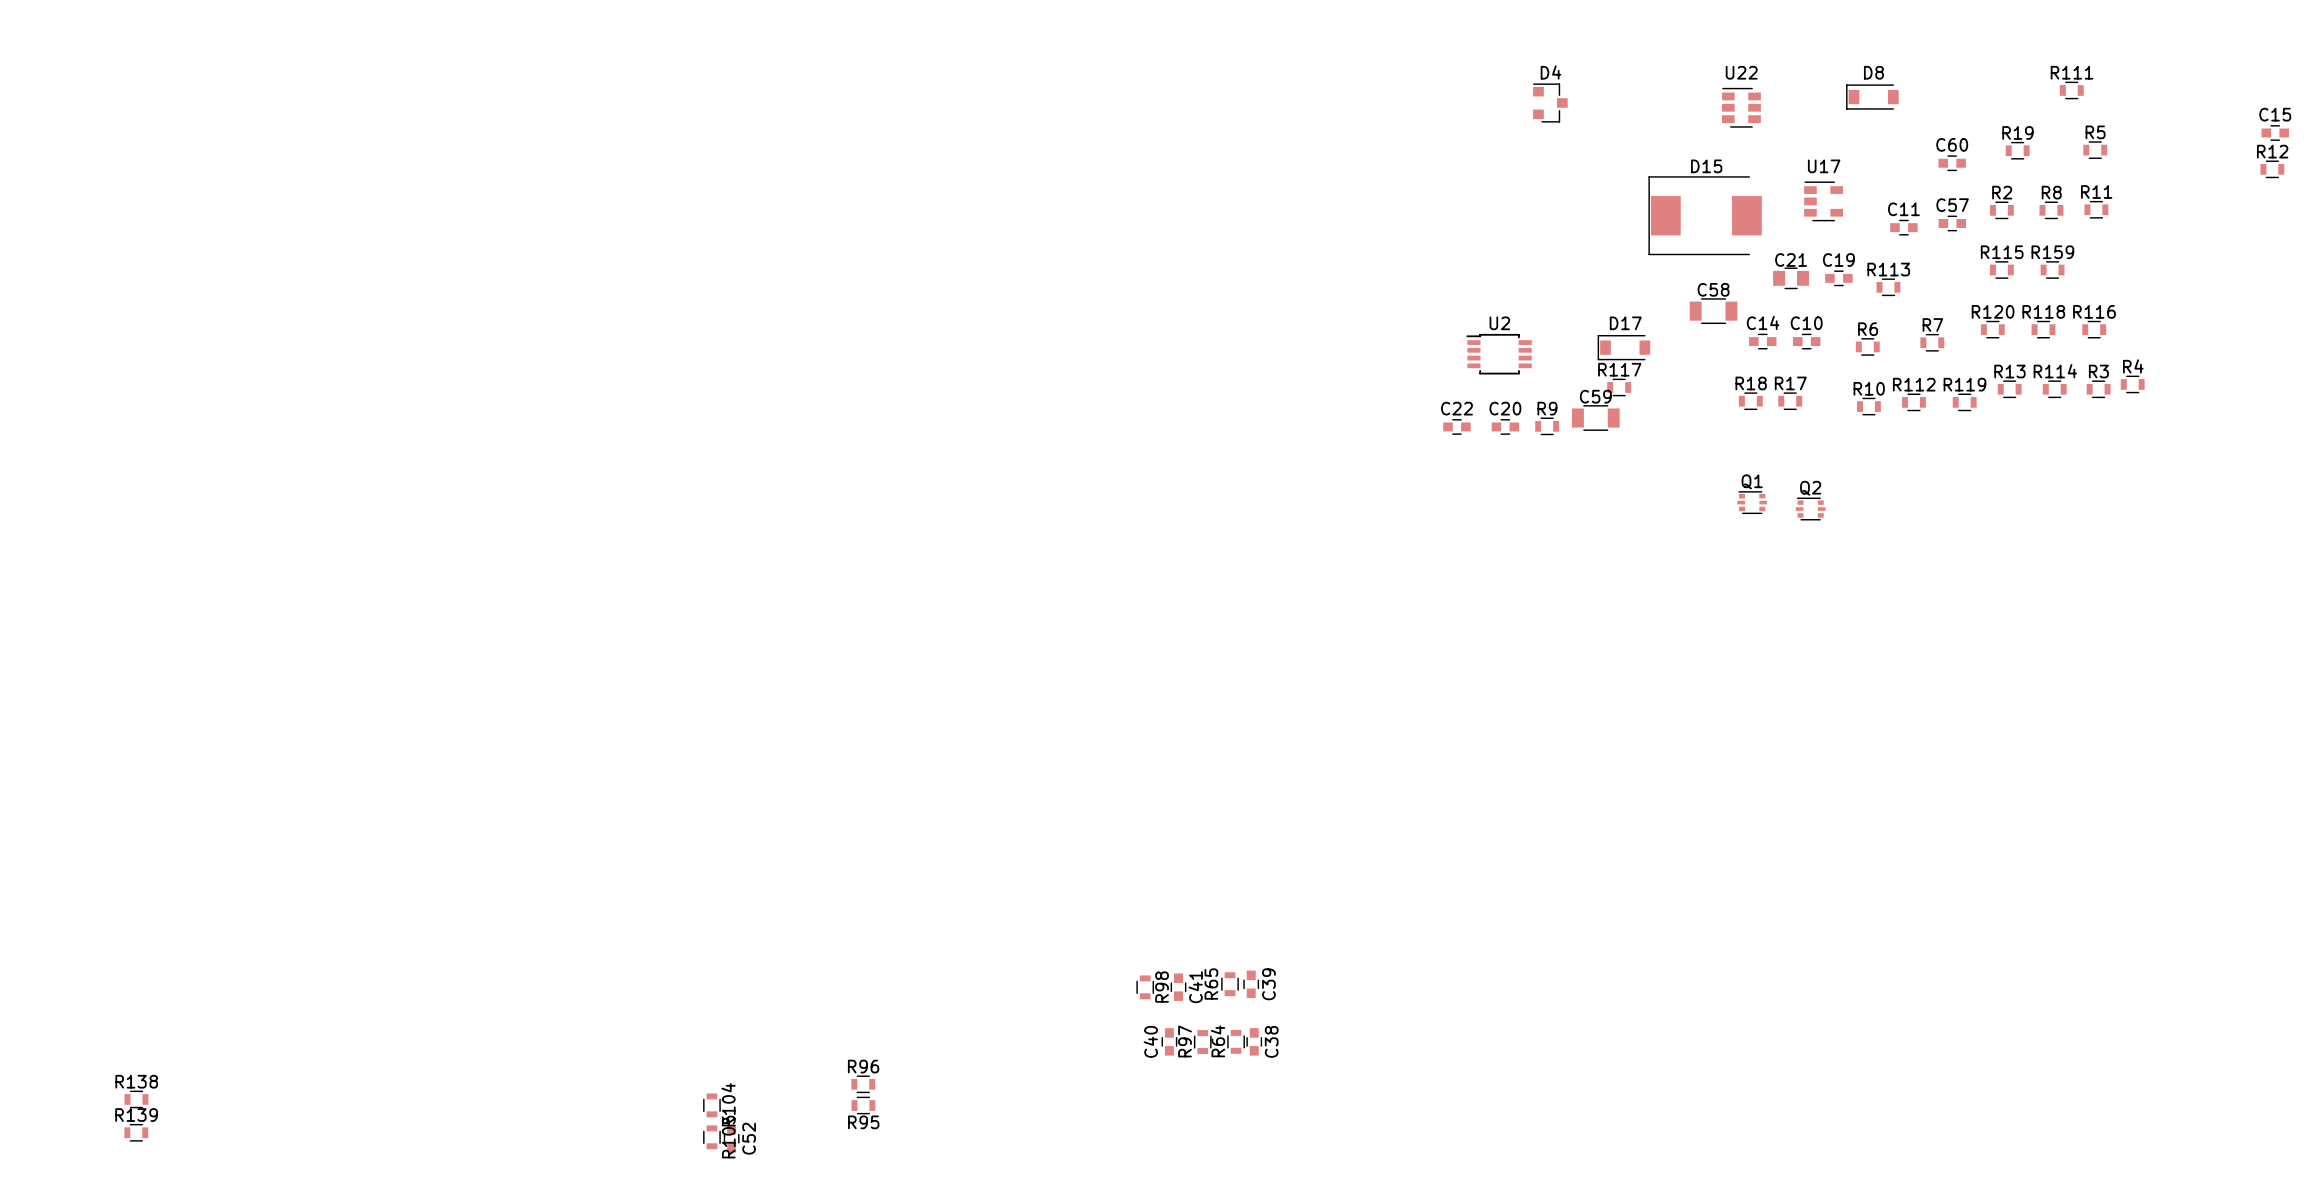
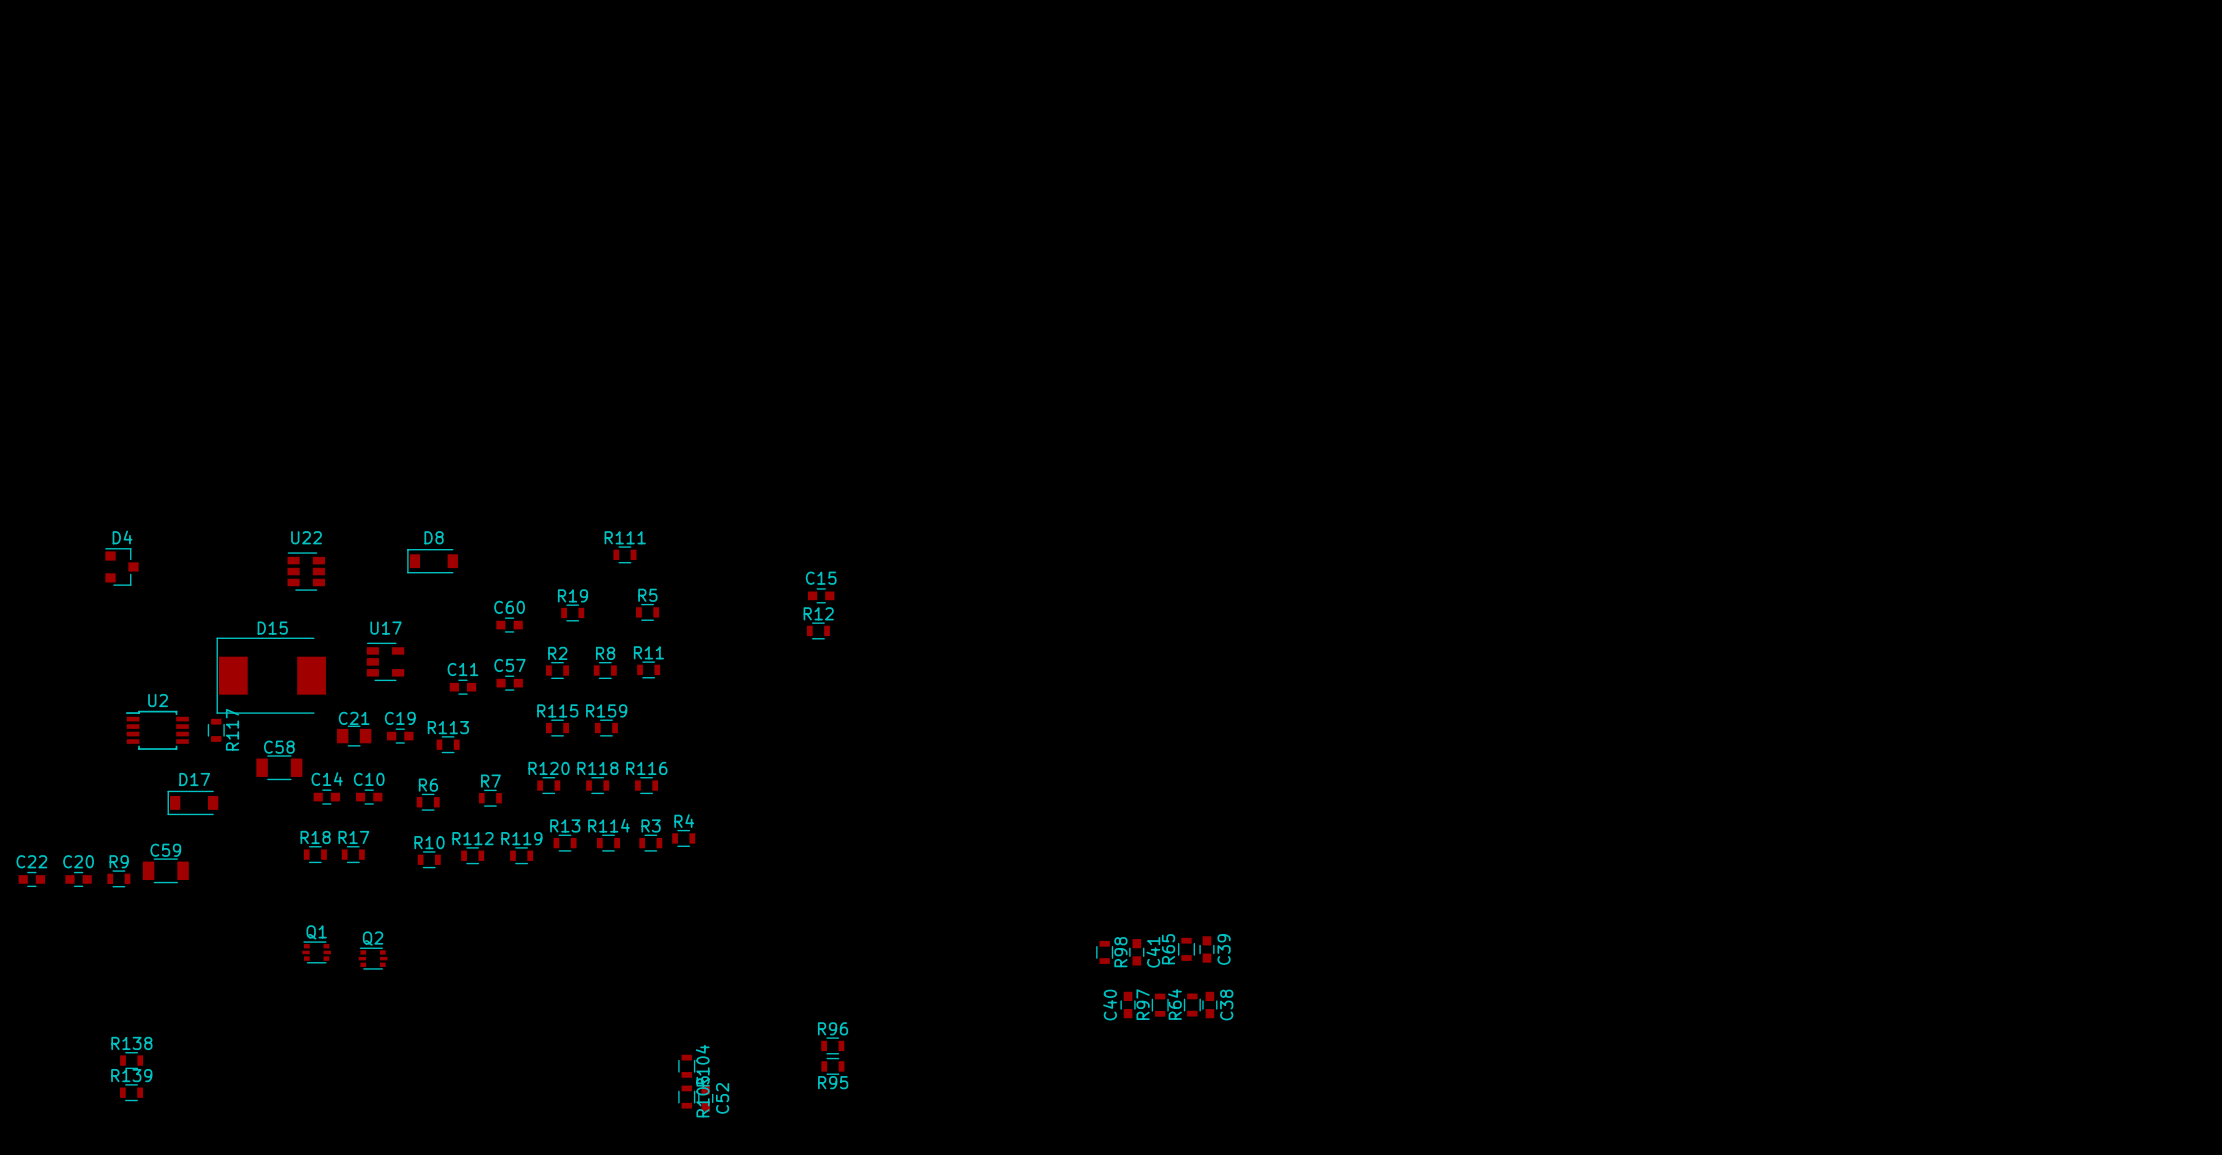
R111 position: (2071, 90) -> (624, 554)
D8 position: (1872, 97) -> (432, 561)
D4 position: (1550, 103) -> (121, 566)
U22 position: (1741, 107) -> (306, 571)
C15 position: (2275, 132) -> (821, 595)
R19 position: (2017, 150) -> (572, 612)
R5 position: (2095, 150) -> (647, 612)
C60 position: (1952, 163) -> (509, 625)
R12 position: (2272, 169) -> (818, 630)
U17 position: (1823, 201) -> (385, 661)
R11 position: (2096, 209) -> (648, 669)
R2 position: (2001, 210) -> (557, 670)
R8 position: (2051, 210) -> (605, 670)
D15 position: (1705, 215) -> (271, 675)
C57 position: (1952, 223) -> (509, 683)
C11 position: (1903, 227) -> (462, 687)
R115 position: (2001, 269) -> (557, 728)
R159 position: (2052, 269) -> (606, 728)
C21 position: (1791, 278) -> (354, 736)
C19 position: (1838, 278) -> (400, 736)
R113 position: (1888, 287) -> (448, 744)
C58 position: (1713, 311) -> (279, 767)
R120 position: (1992, 329) -> (548, 785)
R118 position: (2043, 329) -> (597, 785)
R116 position: (2094, 329) -> (646, 785)
C14 position: (1762, 341) -> (326, 797)
C10 position: (1806, 341) -> (369, 797)
R7 position: (1932, 342) -> (490, 798)
R6 position: (1867, 346) -> (428, 802)
D17 position: (1623, 347) -> (192, 802)
U2 position: (1499, 354) -> (157, 730)
R4 position: (2132, 384) -> (683, 838)
R117 rotation: 0° (1619, 387) -> 90° clockwise (216, 730)
R117 position: (1619, 387) -> (216, 730)
R13 position: (2009, 389) -> (565, 843)
R114 position: (2054, 389) -> (608, 843)
R3 position: (2098, 389) -> (650, 843)
R18 position: (1750, 401) -> (315, 854)
R17 position: (1790, 401) -> (353, 854)
R112 position: (1913, 402) -> (472, 855)
R119 position: (1964, 402) -> (521, 855)
R10 position: (1868, 406) -> (429, 859)
C59 position: (1595, 418) -> (165, 870)
C22 position: (1456, 426) -> (31, 879)
C20 position: (1505, 426) -> (78, 879)
R9 position: (1547, 426) -> (118, 878)
Q1 position: (1752, 502) -> (316, 952)
Q2 position: (1810, 509) -> (373, 958)

